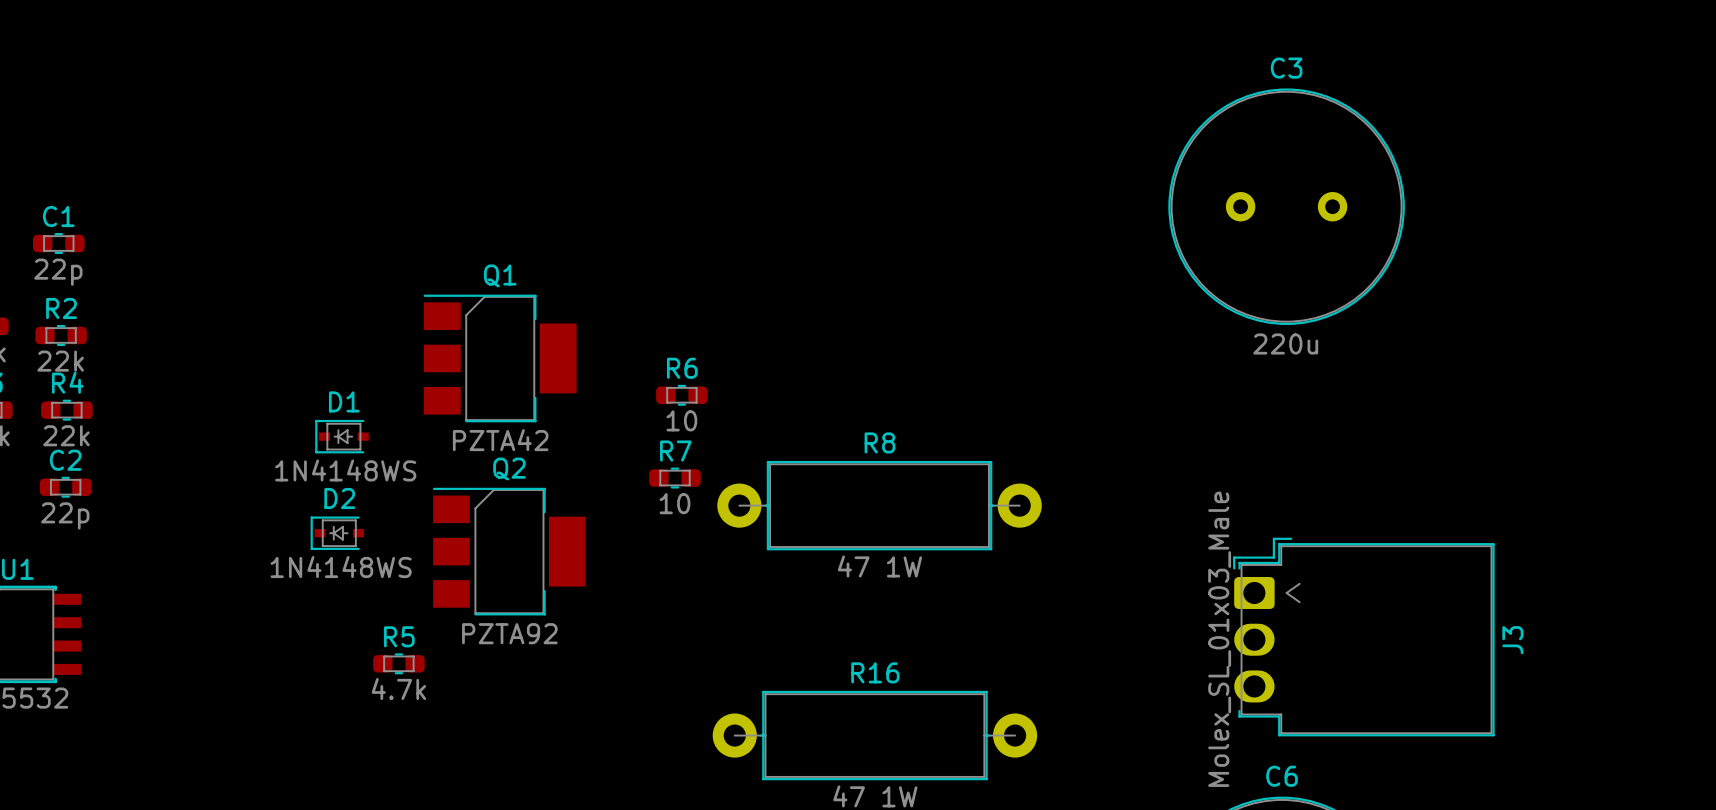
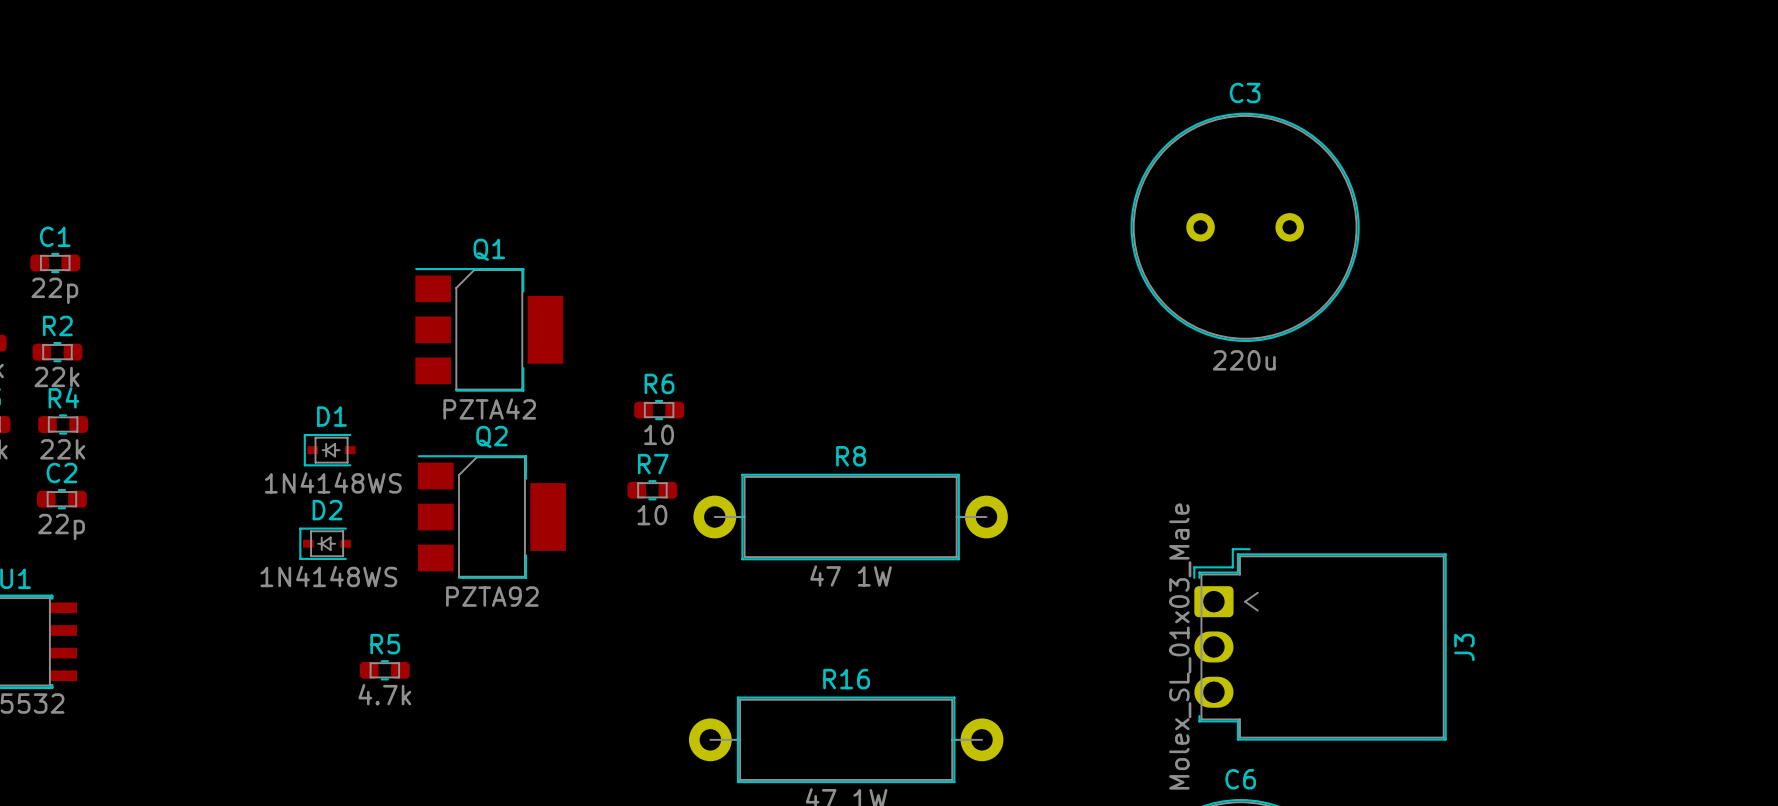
Q1 position: (500, 358) -> (489, 329)
Q2 position: (509, 551) -> (491, 517)

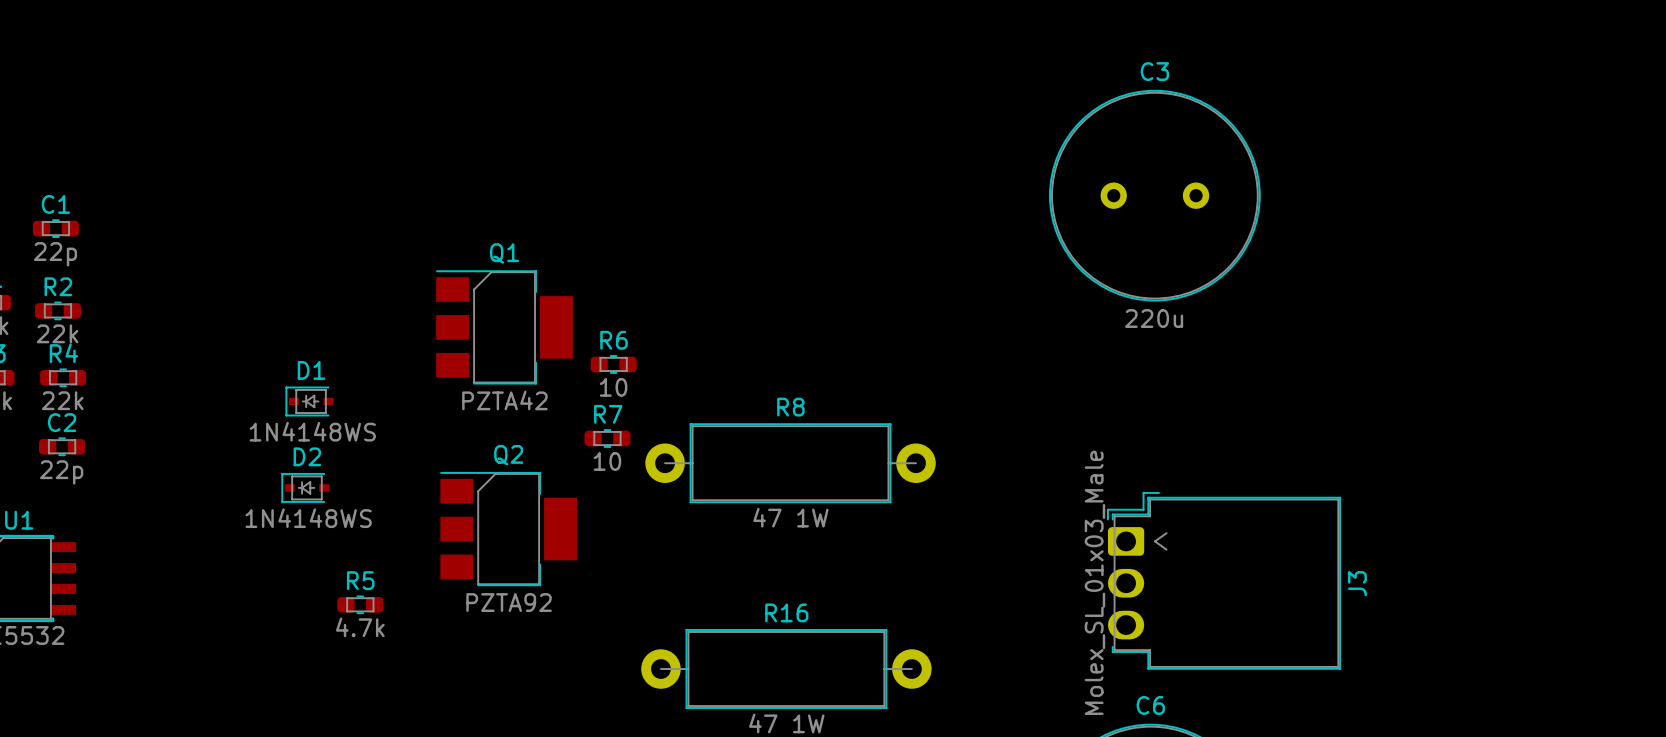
Q1 footprint: [415, 267, 564, 392] -> [436, 270, 573, 385]
Q2 footprint: [417, 455, 566, 579] -> [440, 471, 577, 587]

